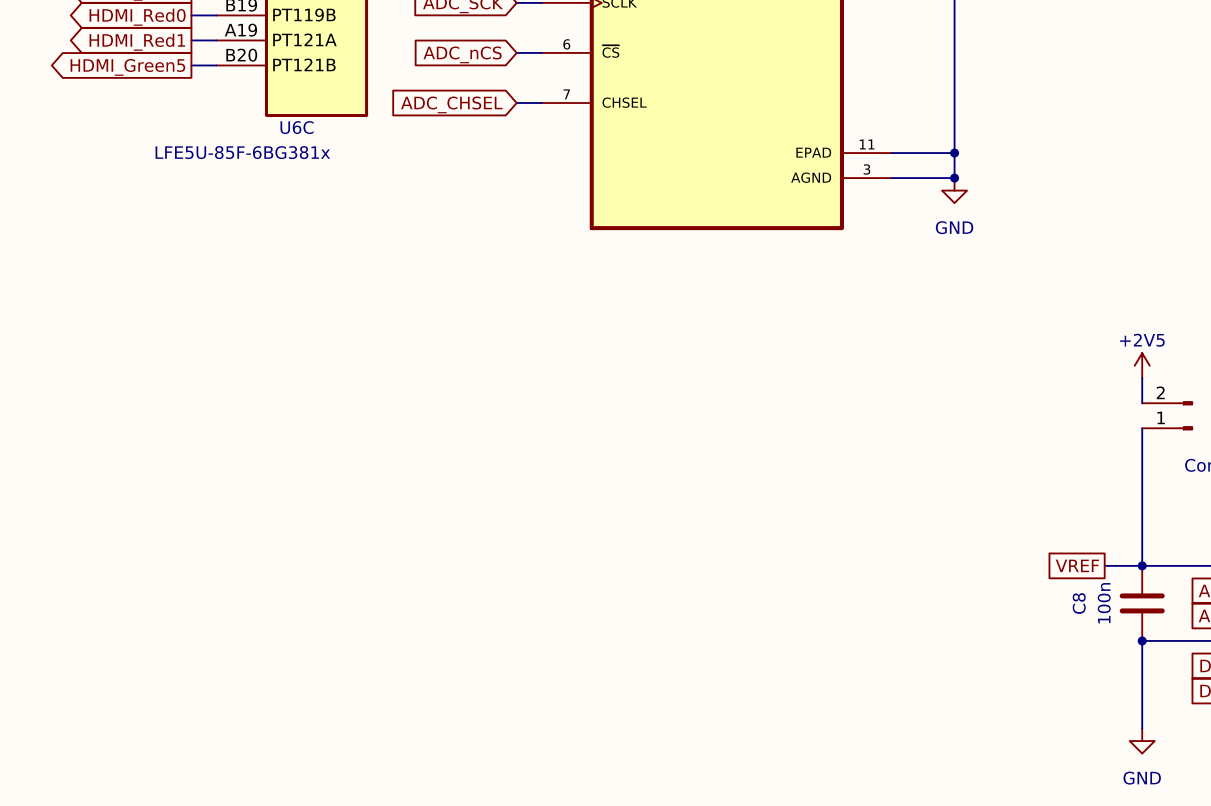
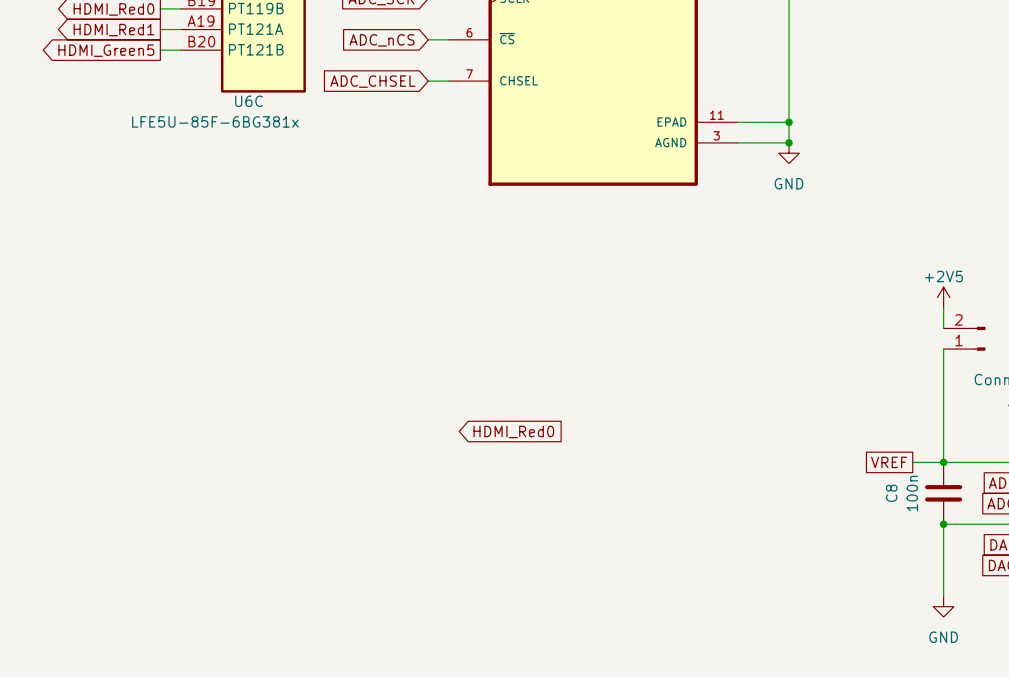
global label: none -> HDMI_Red0 (513, 431)

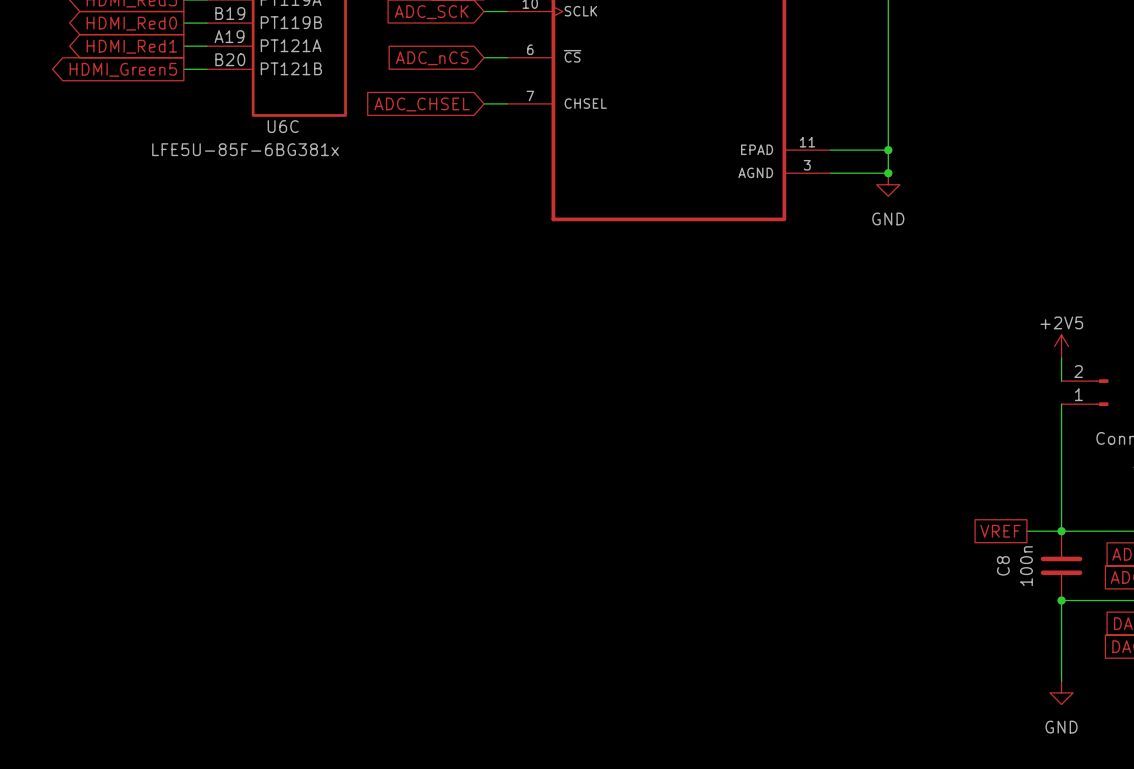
global label: HDMI_Red0 (513, 431) -> none

